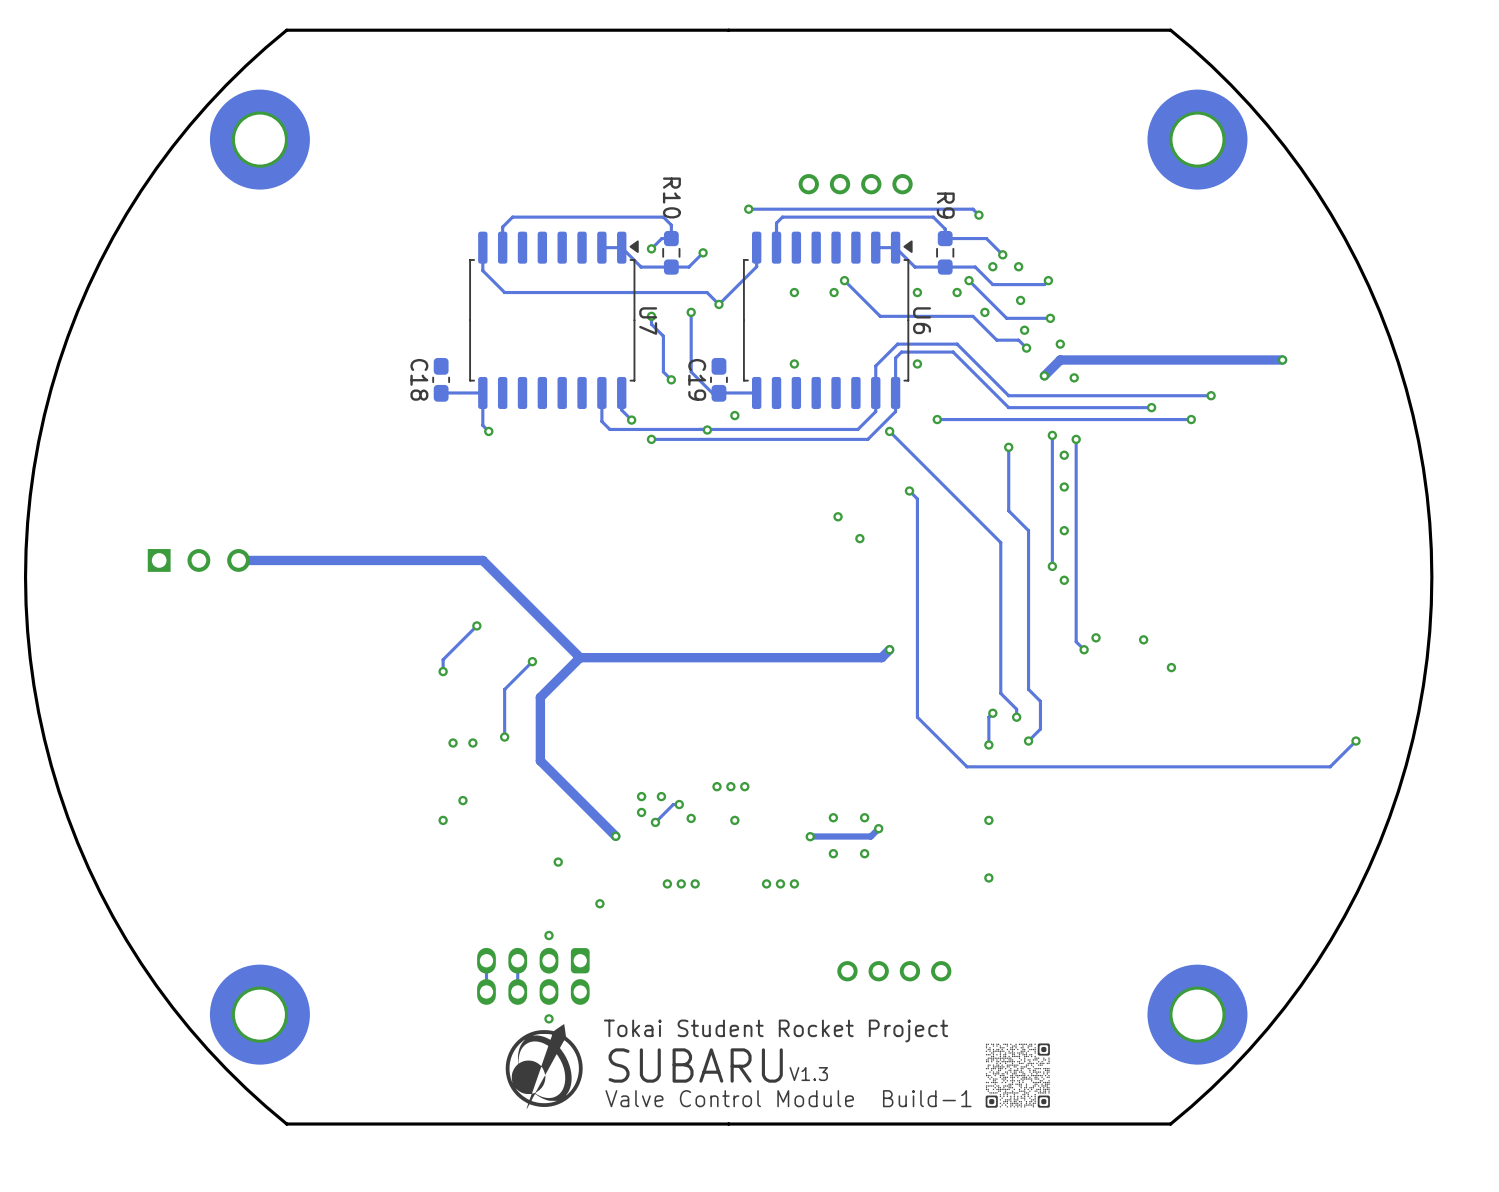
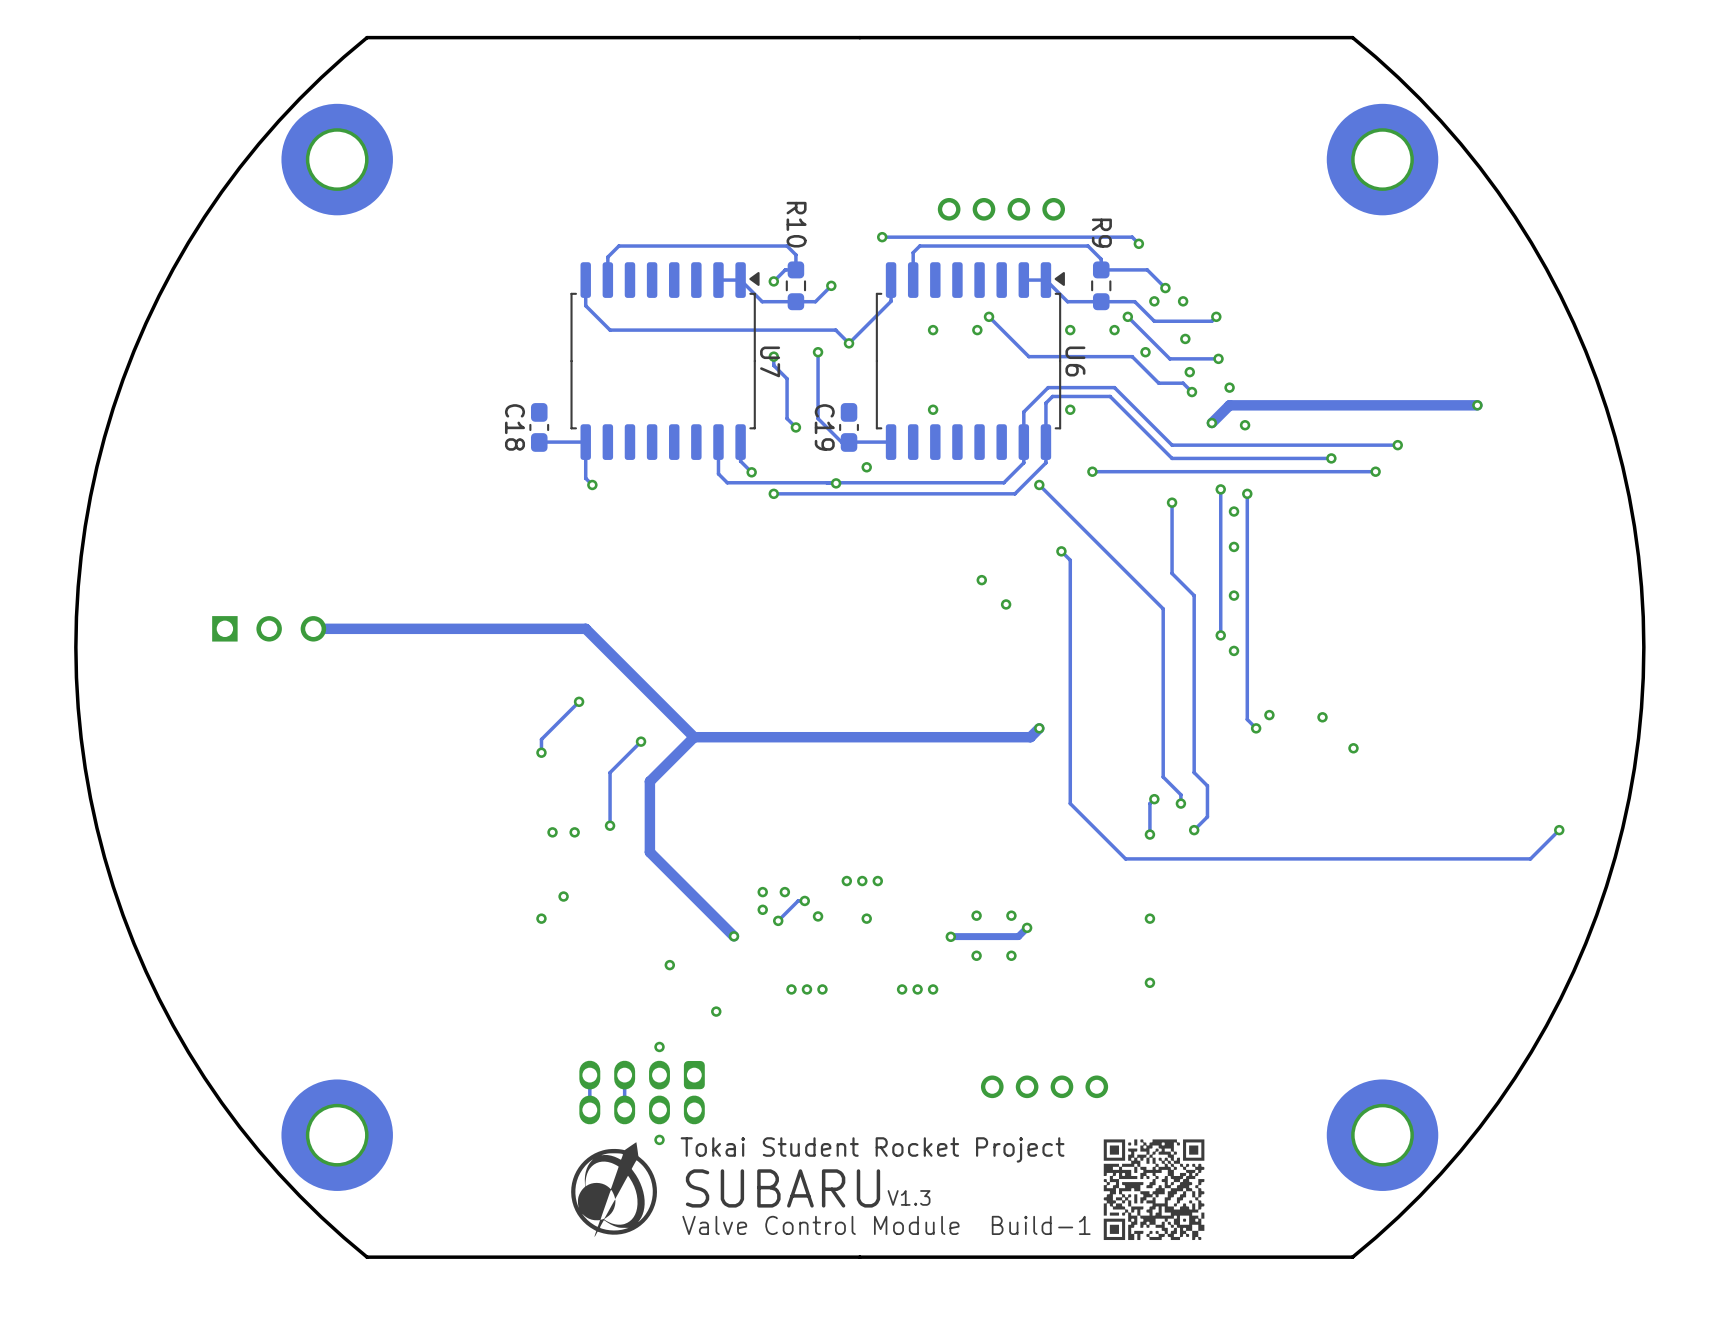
drawing: none -> [1103, 1139, 1205, 1241]
text position: Tokai Student Rocket Project (776, 1030) -> Tokai Student Rocket Project (872, 1149)
drawing: [985, 1043, 1050, 1108] -> none
text position: SUBARU (695, 1065) -> SUBARU (783, 1188)
drawing position: (544, 1066) -> (614, 1189)
text position: V1.3 (808, 1074) -> V1.3 (909, 1197)
text position: Valve Control Module Build-1 (788, 1098) -> Valve Control Module Build-1 (886, 1225)

